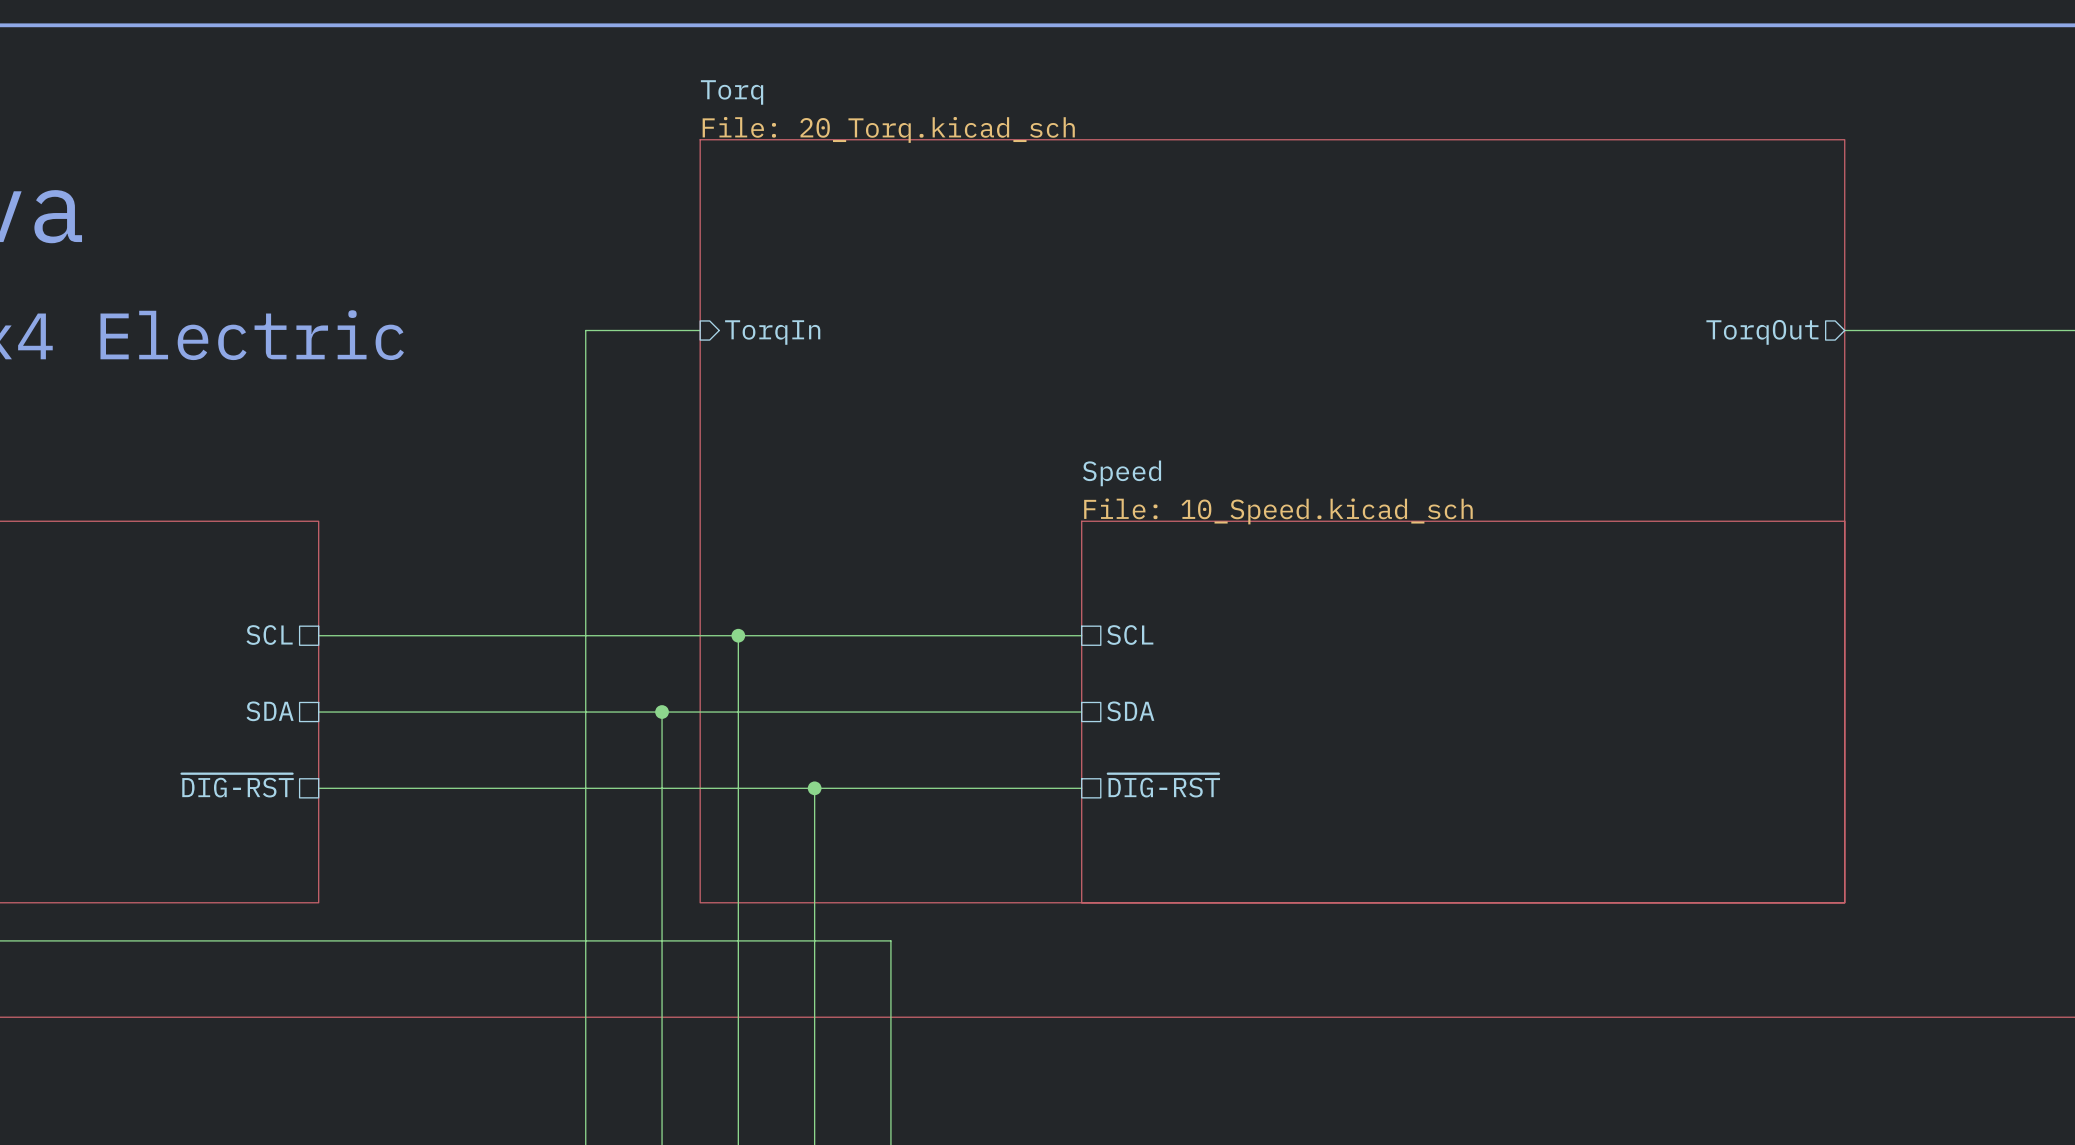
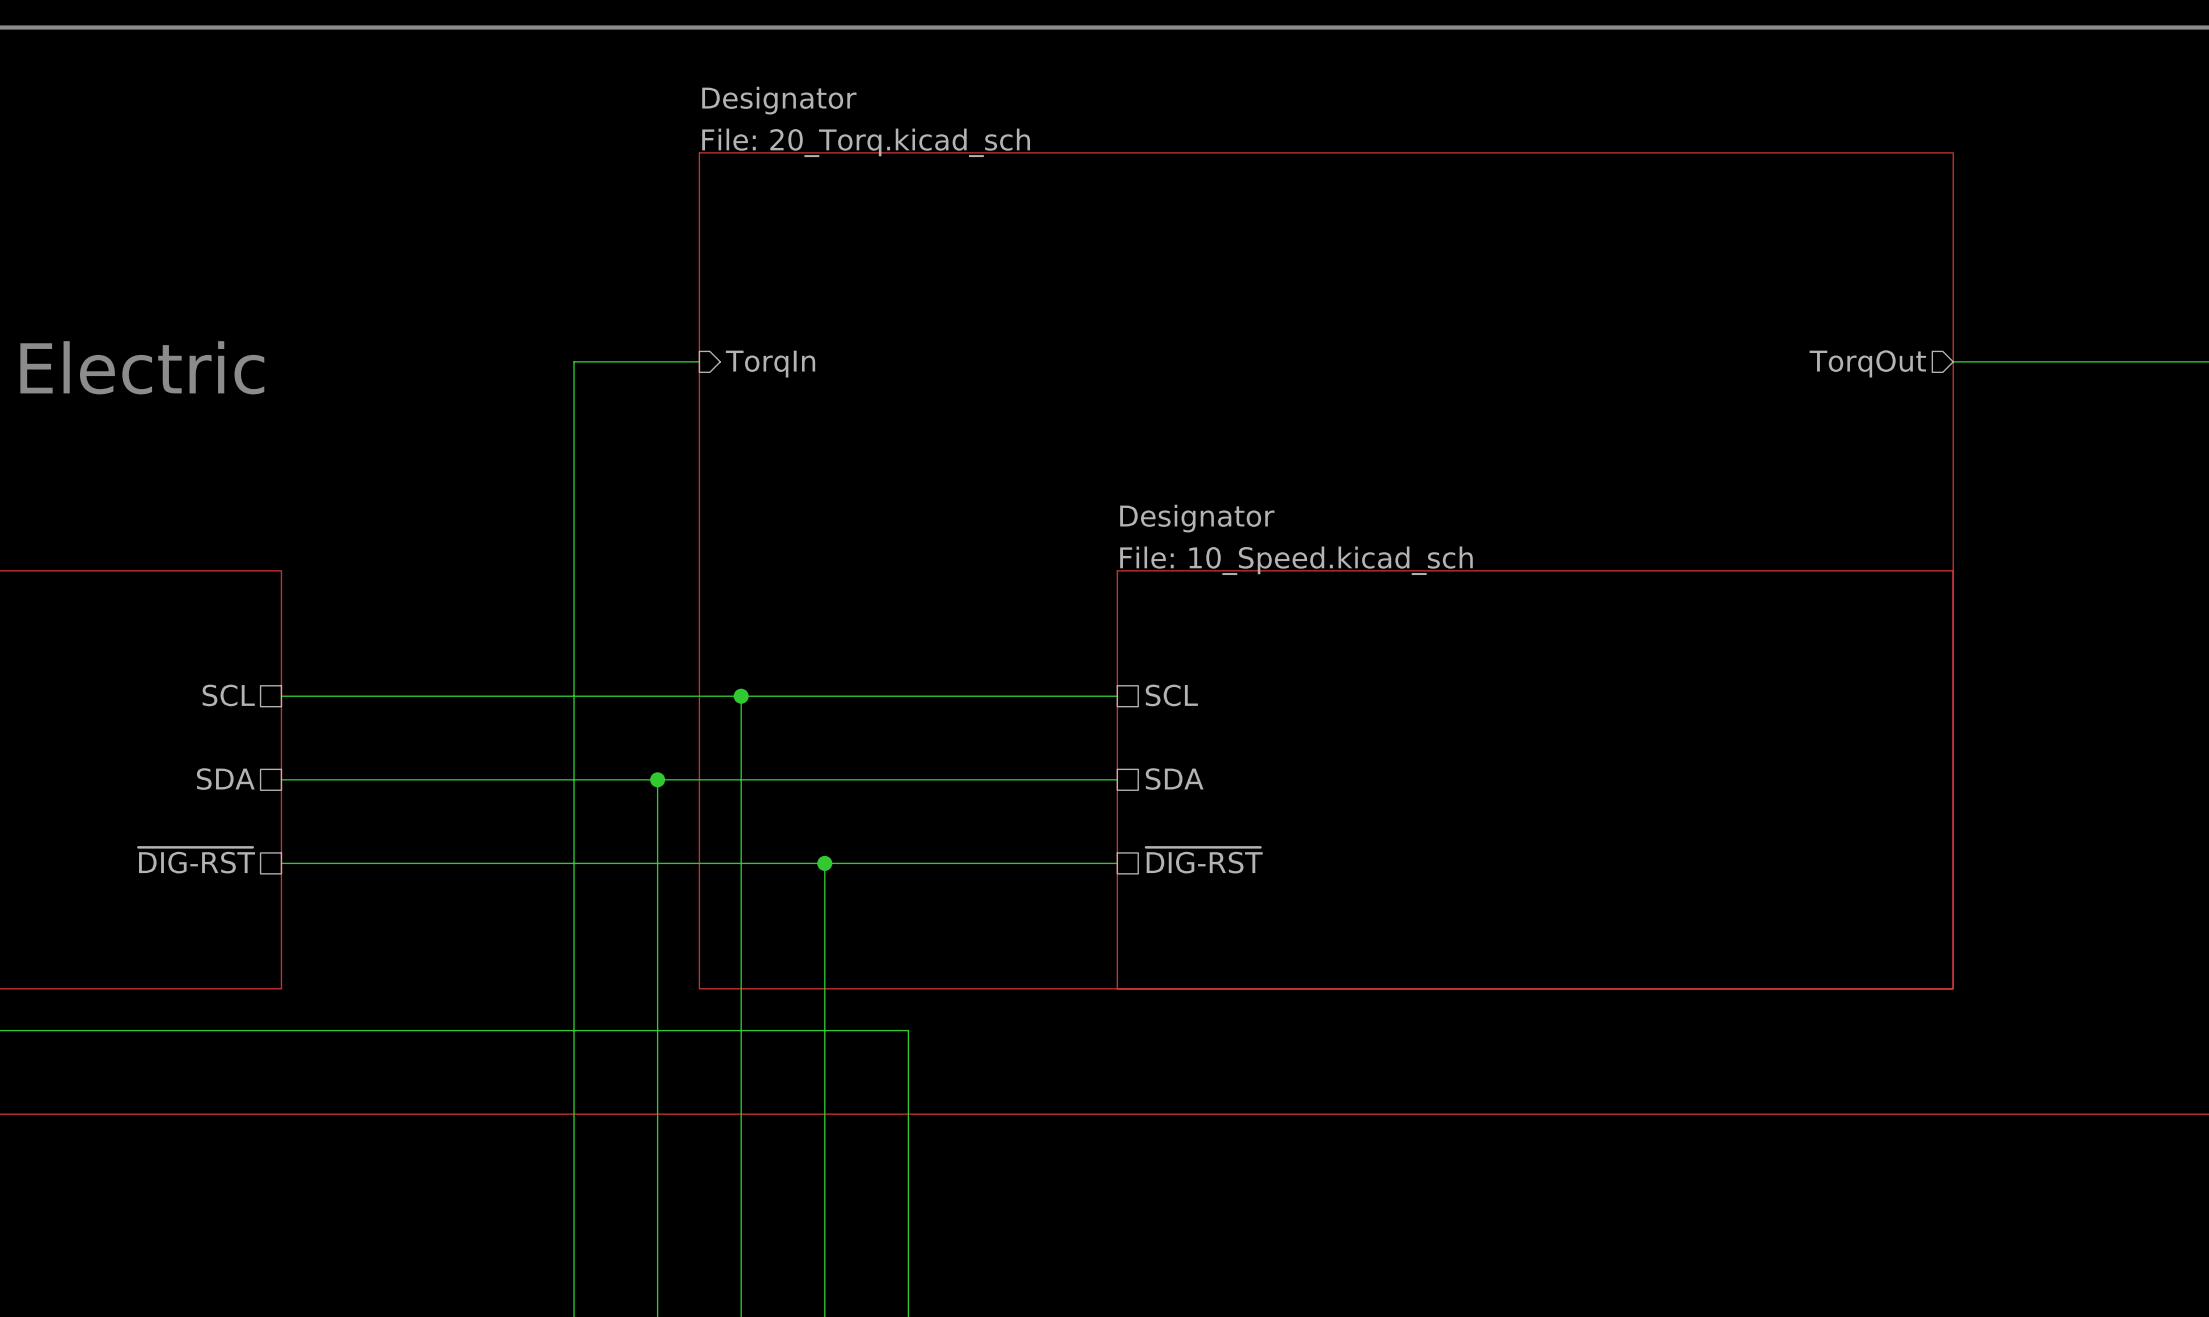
sheet Torq name: Torq (732, 92) -> Designator (779, 100)
sheet Speed name: Speed (1122, 473) -> Designator (1197, 518)

